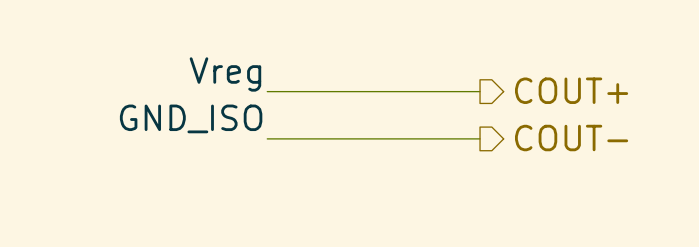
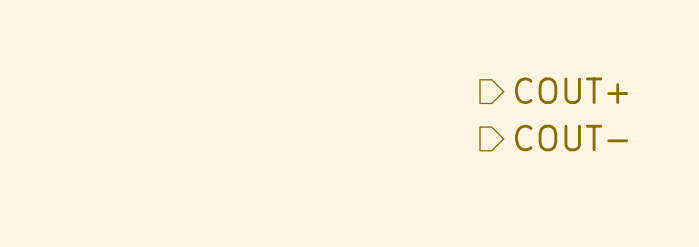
label: Vreg (225, 74) -> none
wire: (267, 91) (480, 91) -> none
label: GND_ISO (191, 118) -> none
wire: (267, 138) (480, 138) -> none

